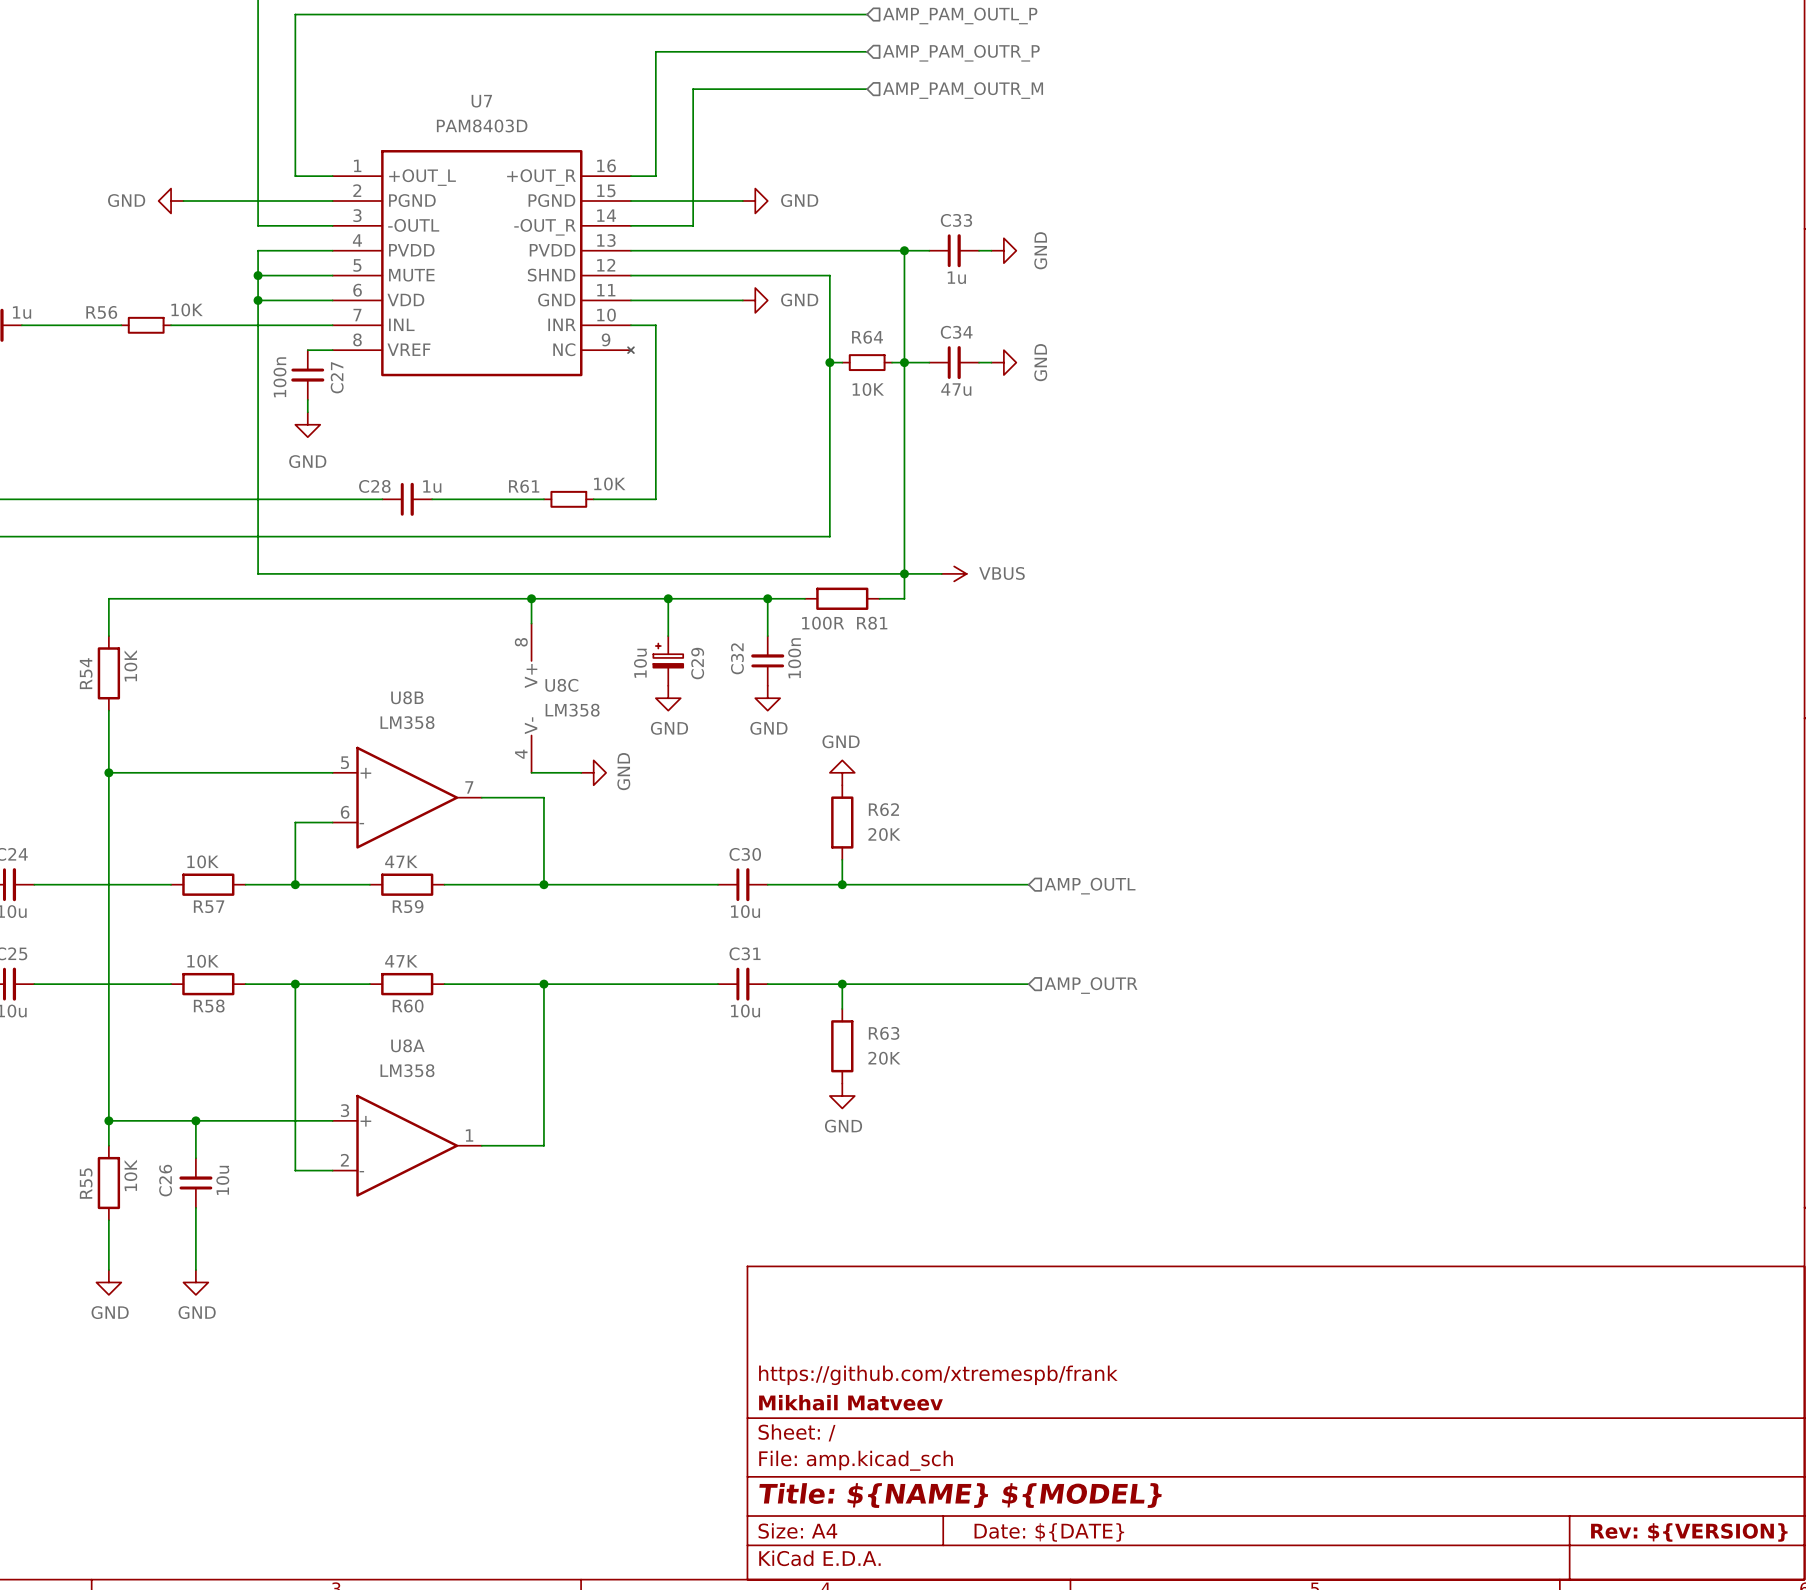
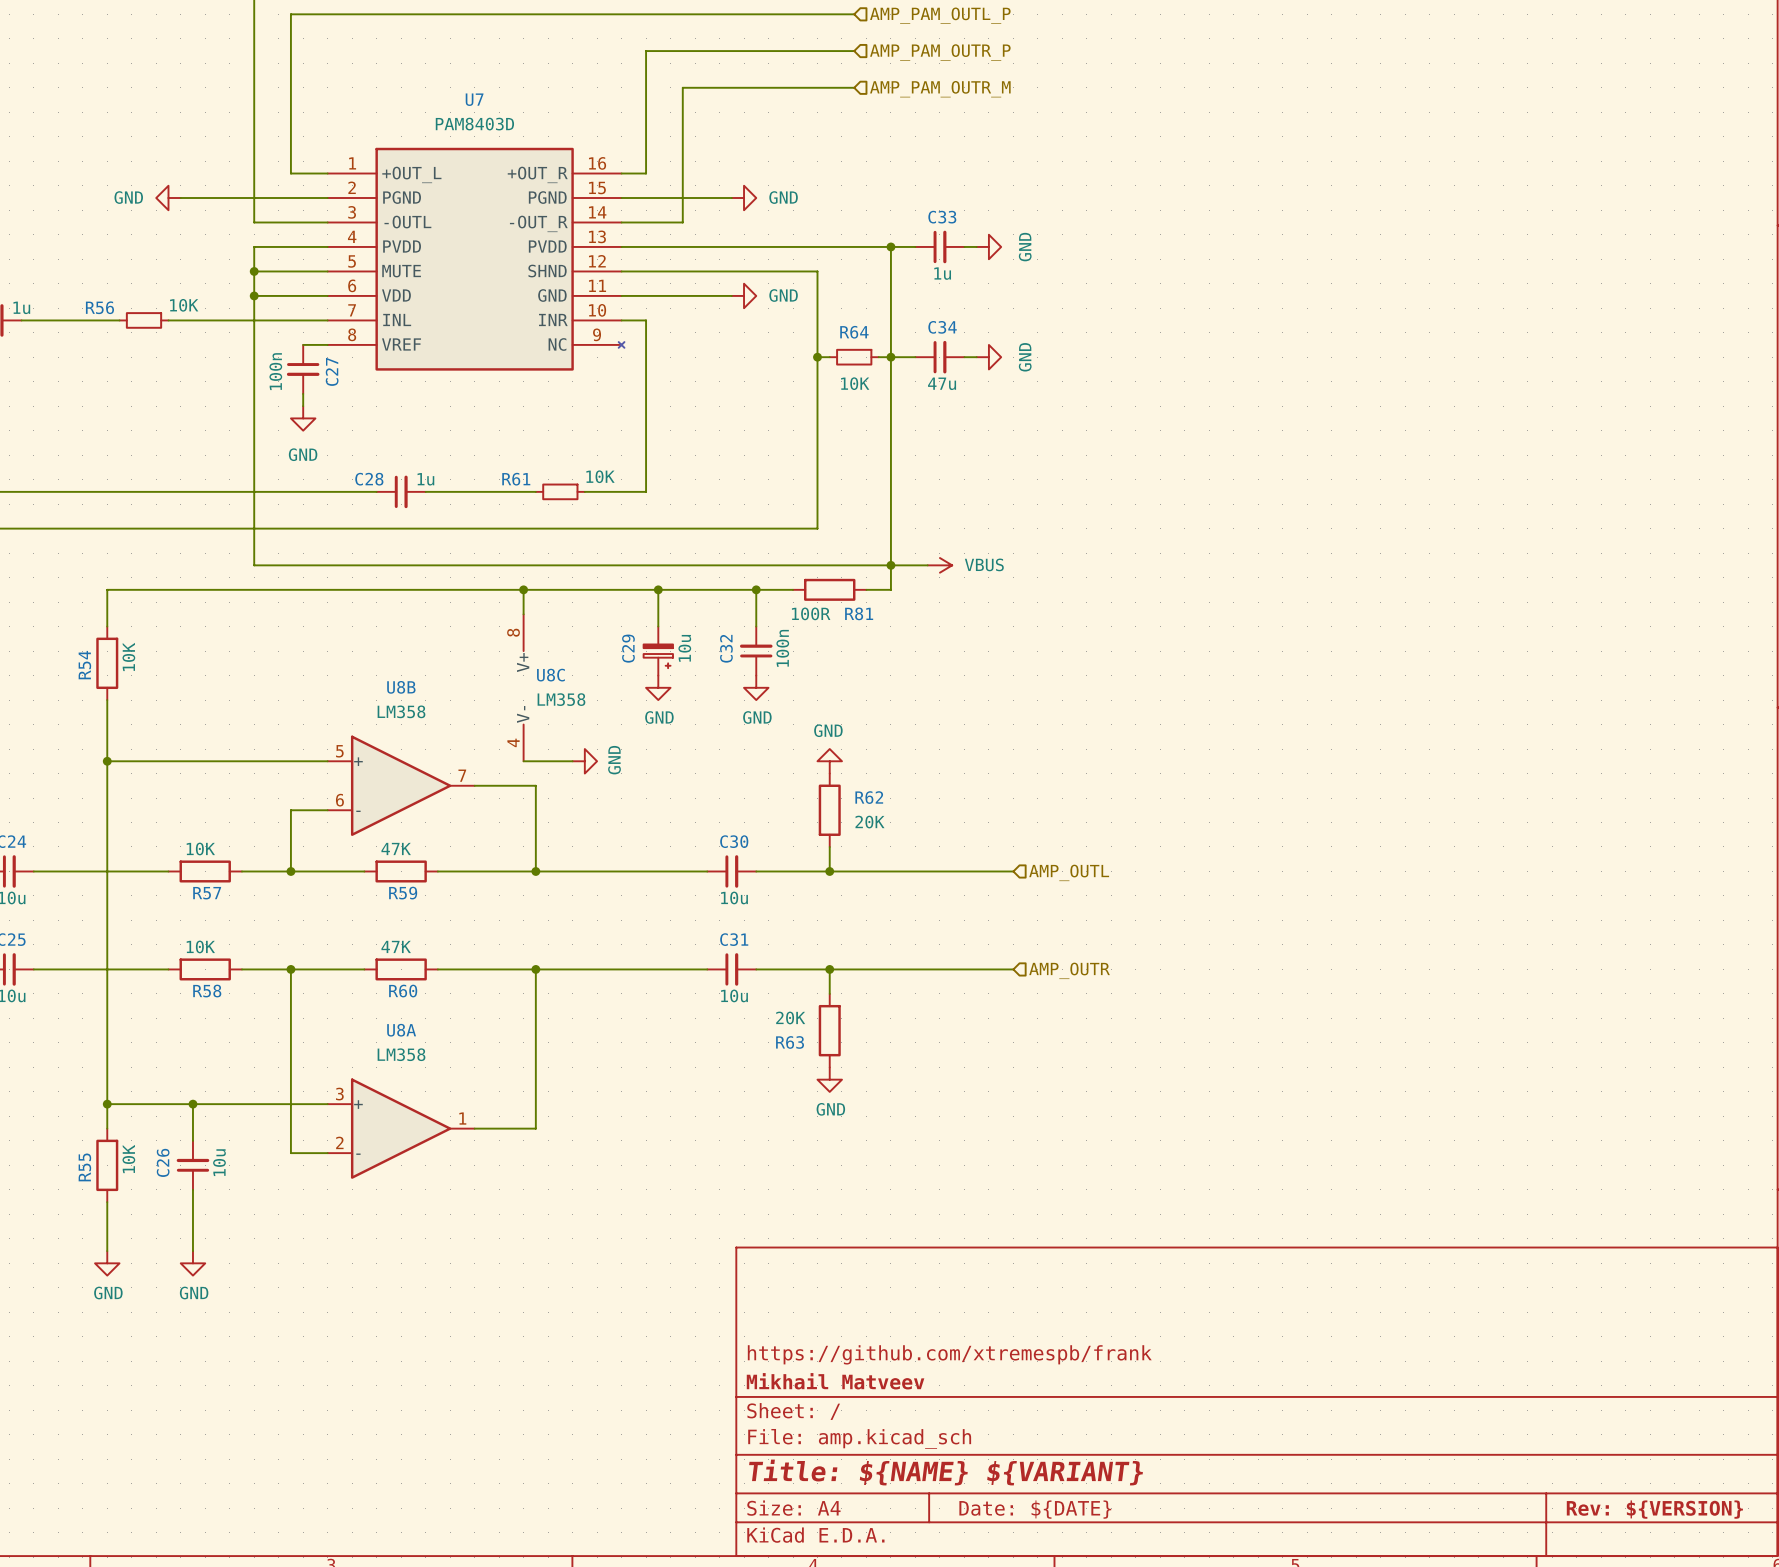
C29 rotation: 0° (668, 655) -> 180° (658, 656)
R63 name position: R63 (884, 1033) -> R63 (790, 1042)
R63 value position: 20K (884, 1058) -> 20K (790, 1017)
title block: Title: ${NAME} ${MODEL} (960, 1495) -> Title: ${NAME} ${VARIANT} (946, 1472)

